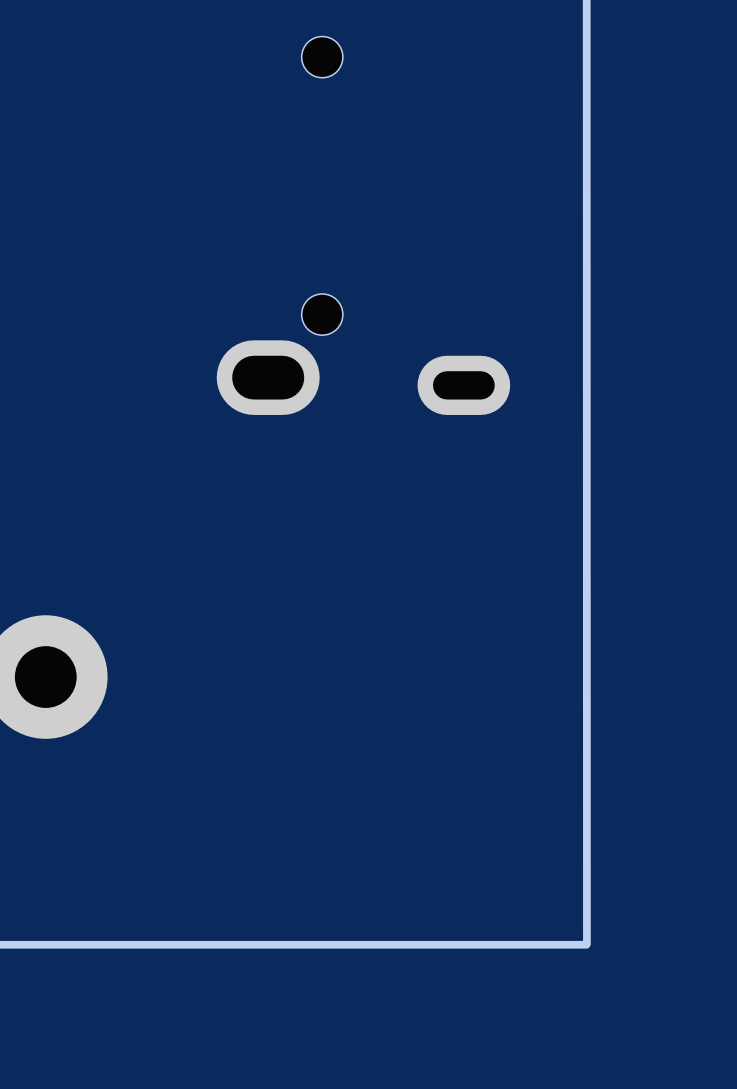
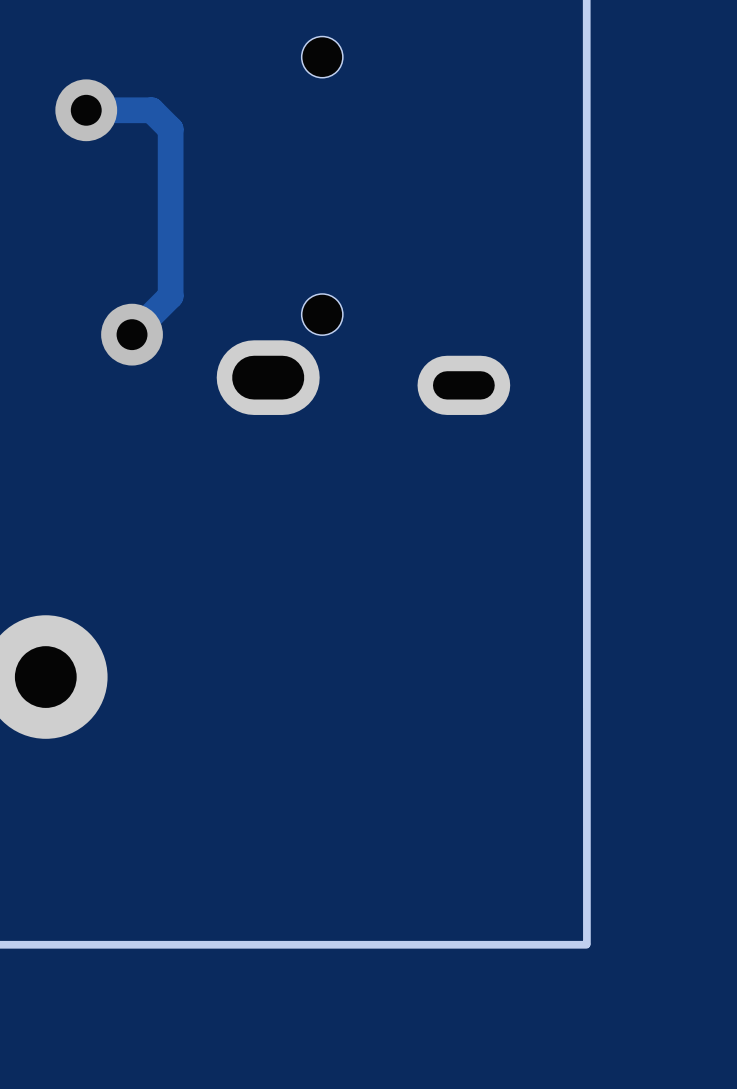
track: none -> (86, 110) (151, 110) (170, 129) (170, 296) (132, 334)
via: none -> (86, 110)
via: none -> (132, 334)

